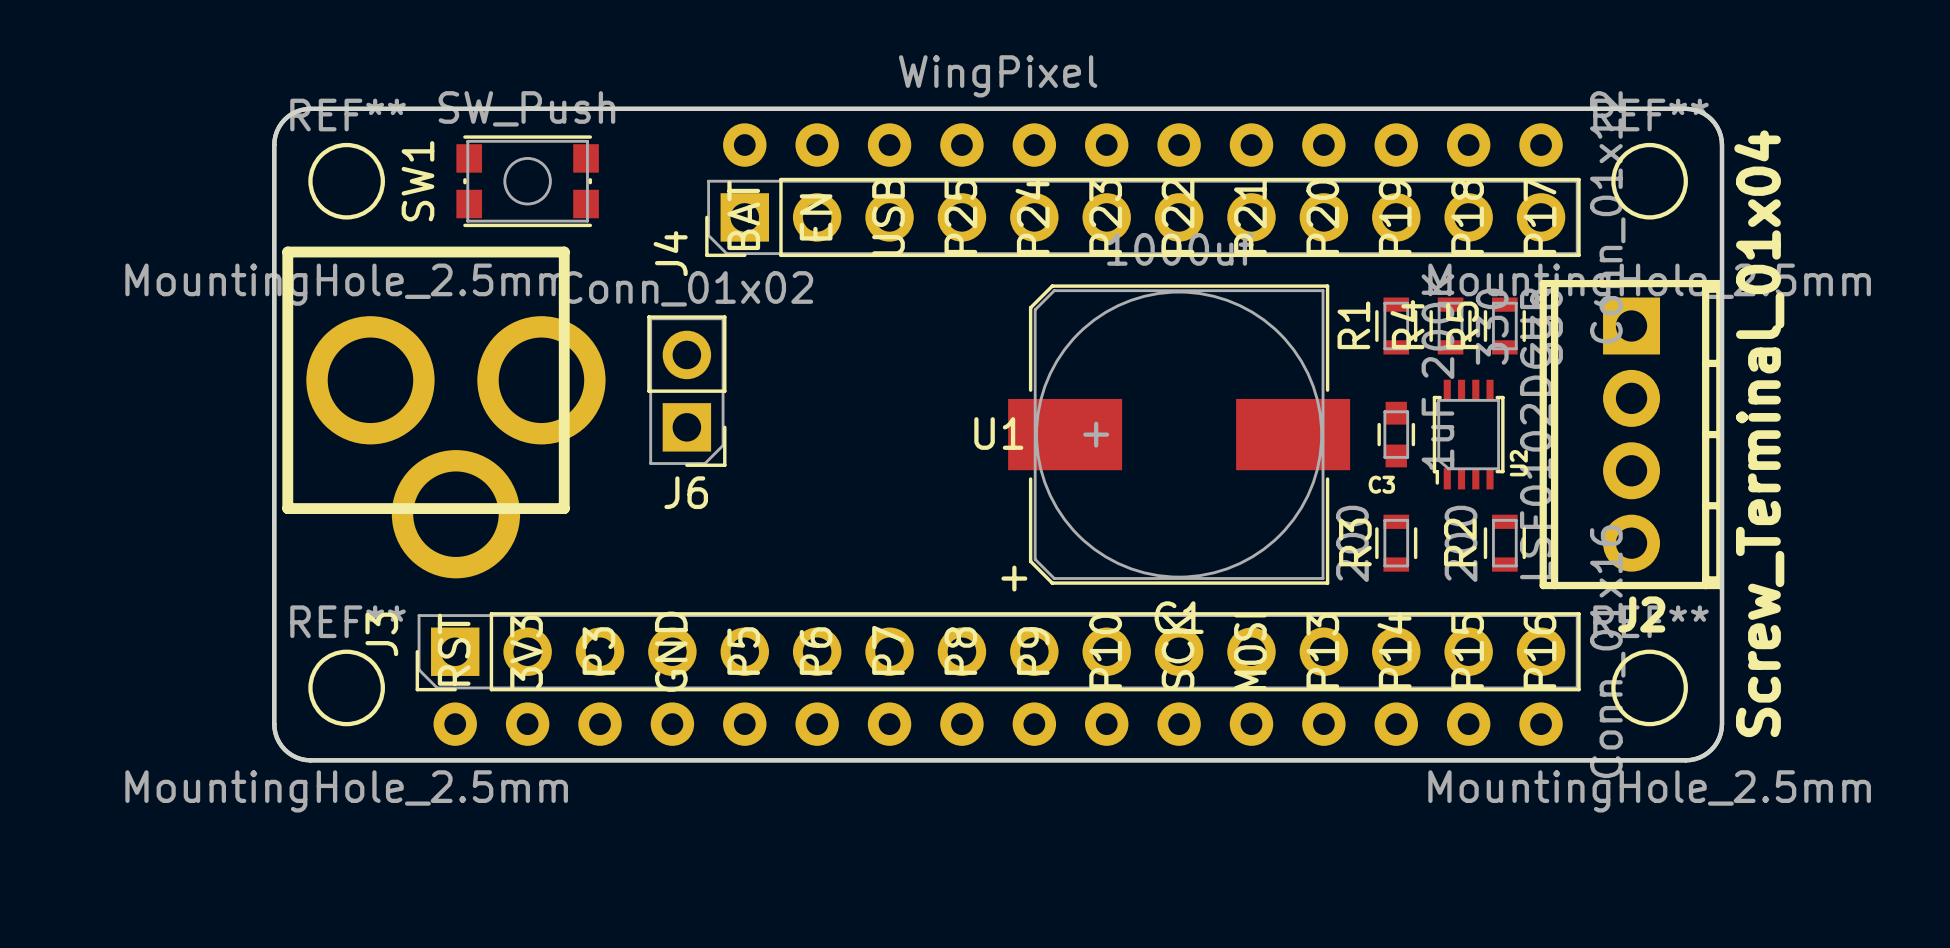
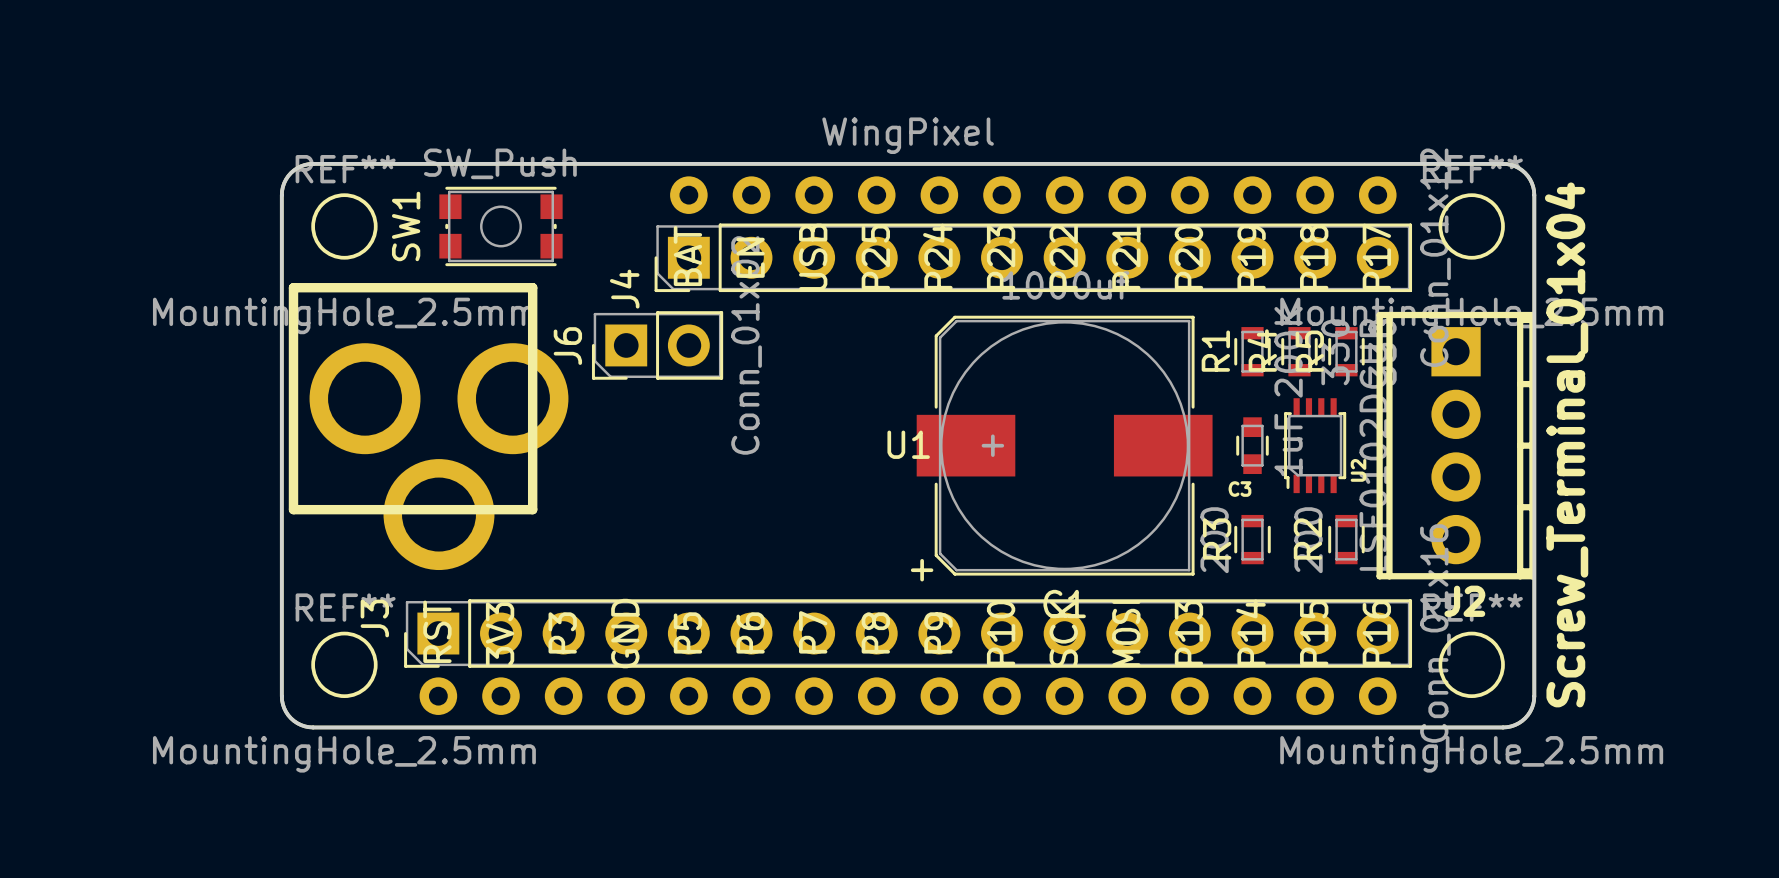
J6 rotation: 0° (686, 391) -> 90° clockwise (657, 345)

